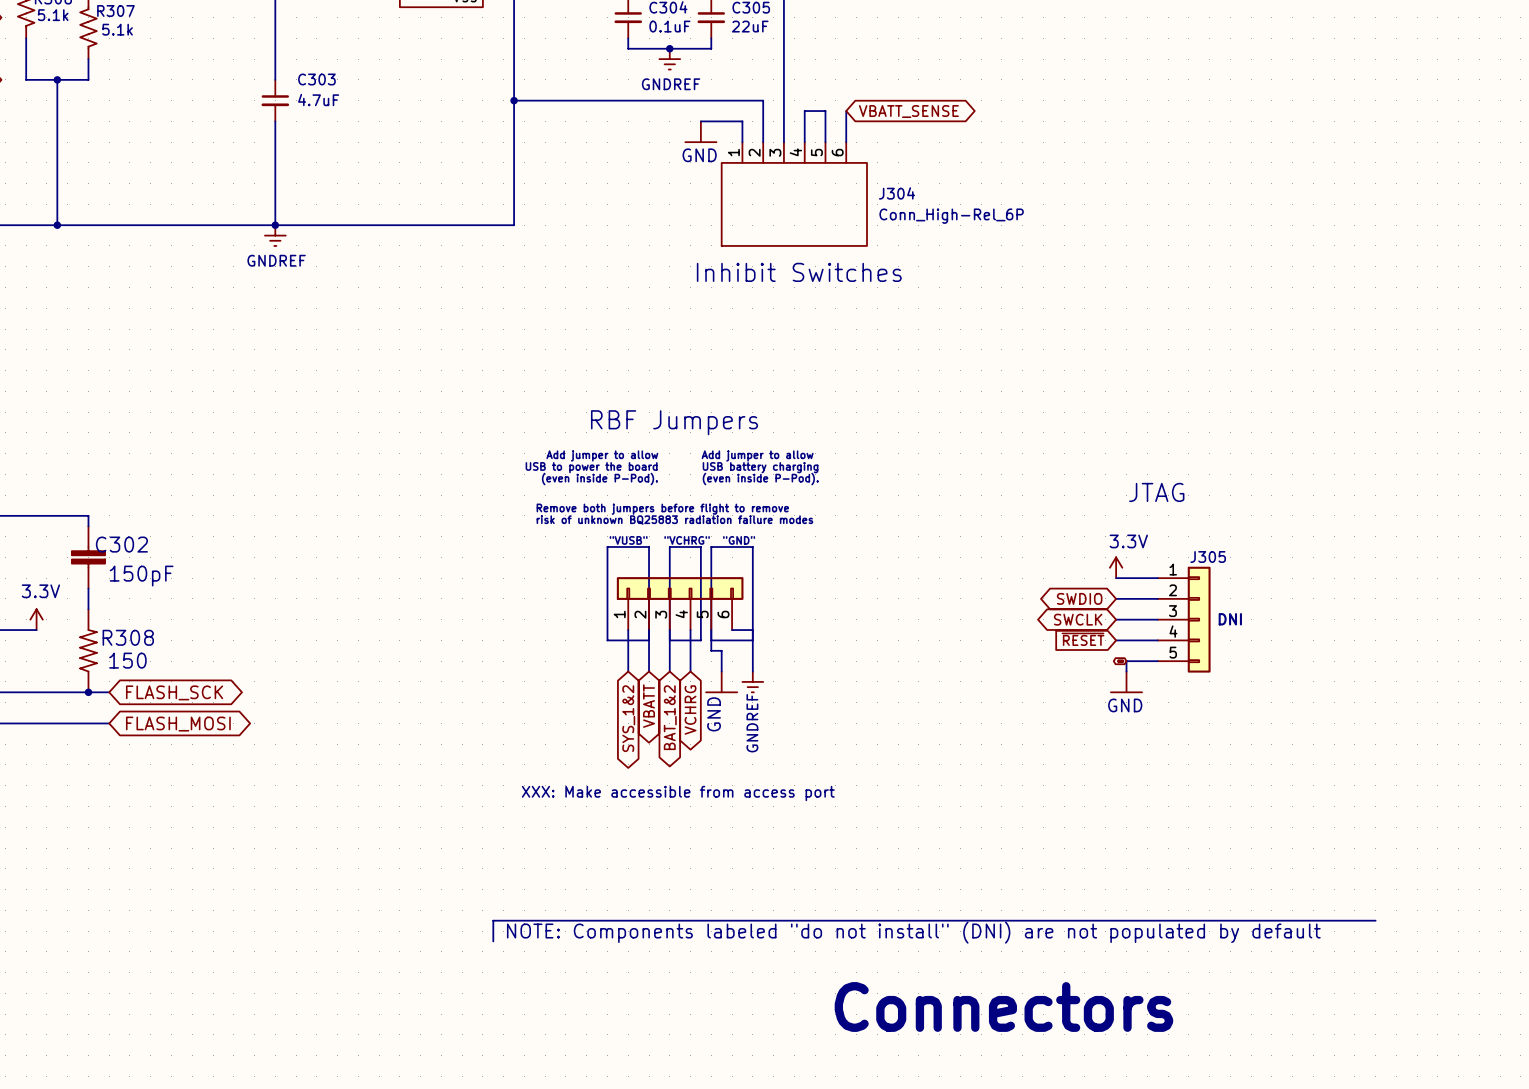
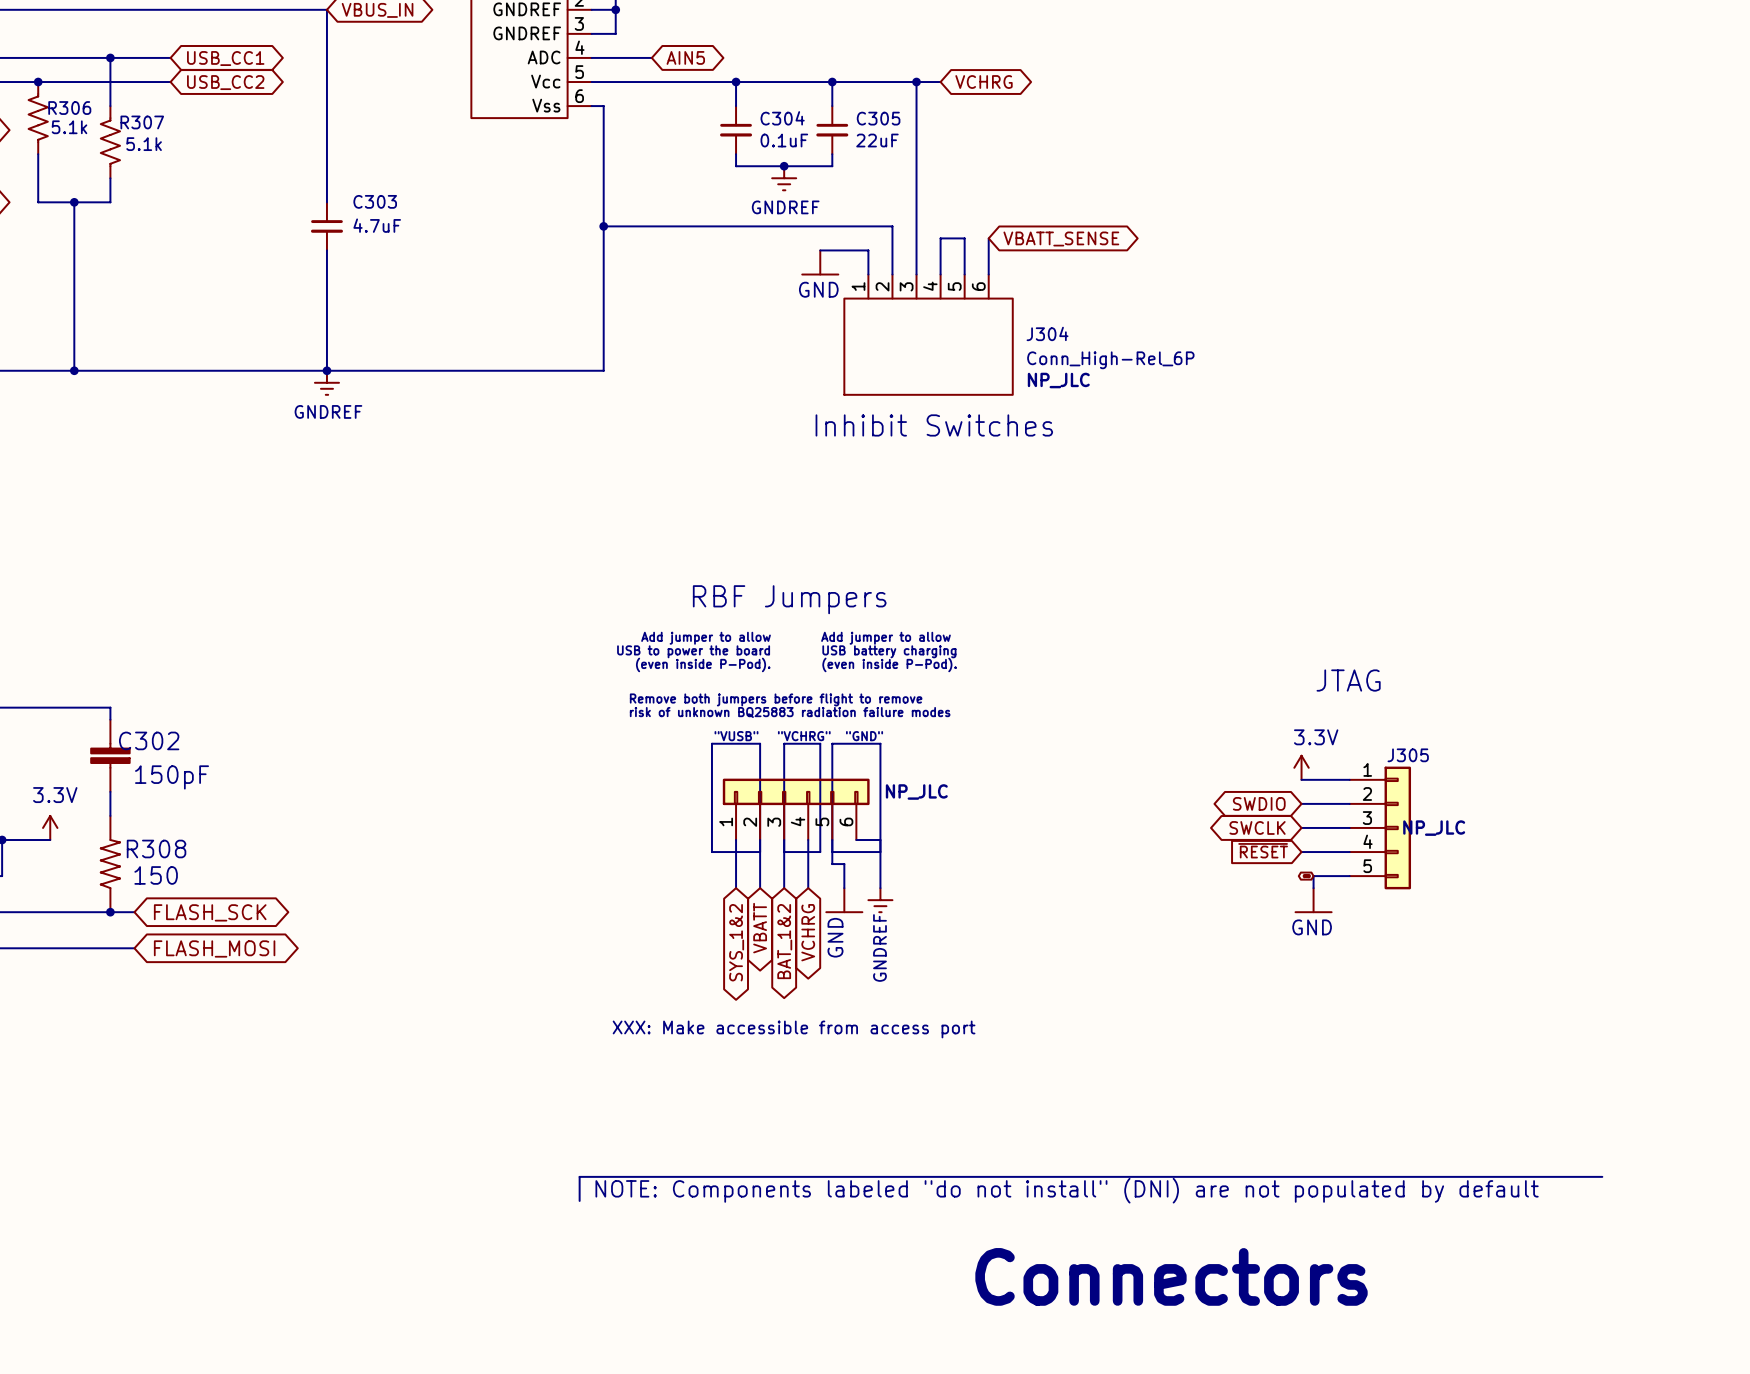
J304 text: none -> NP_JLC (1058, 380)
part text: none -> NP_JLC (916, 791)
J305 text: DNI (1230, 619) -> NP_JLC (1434, 828)

